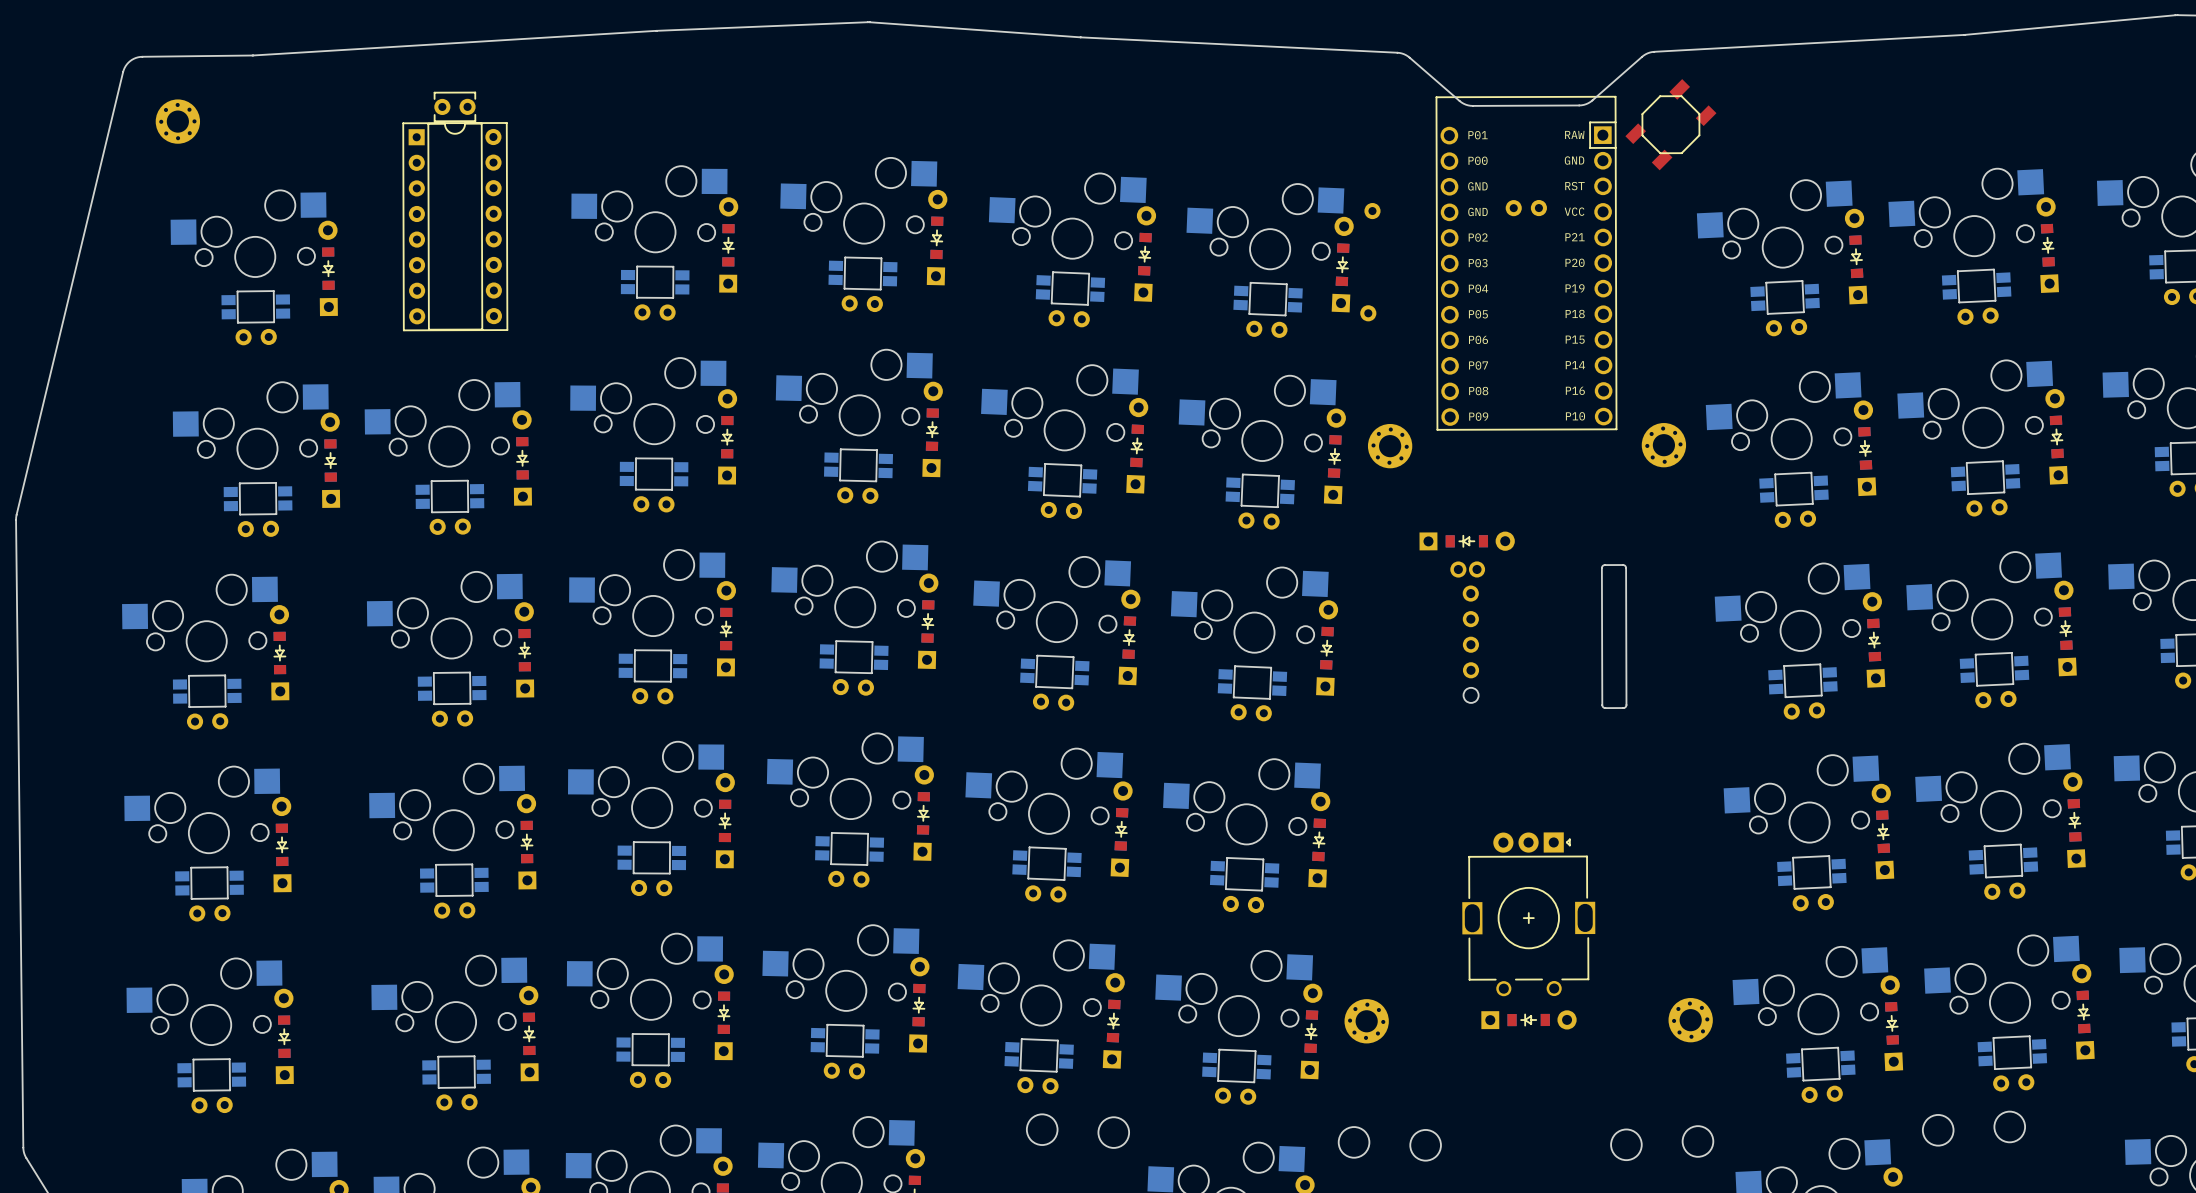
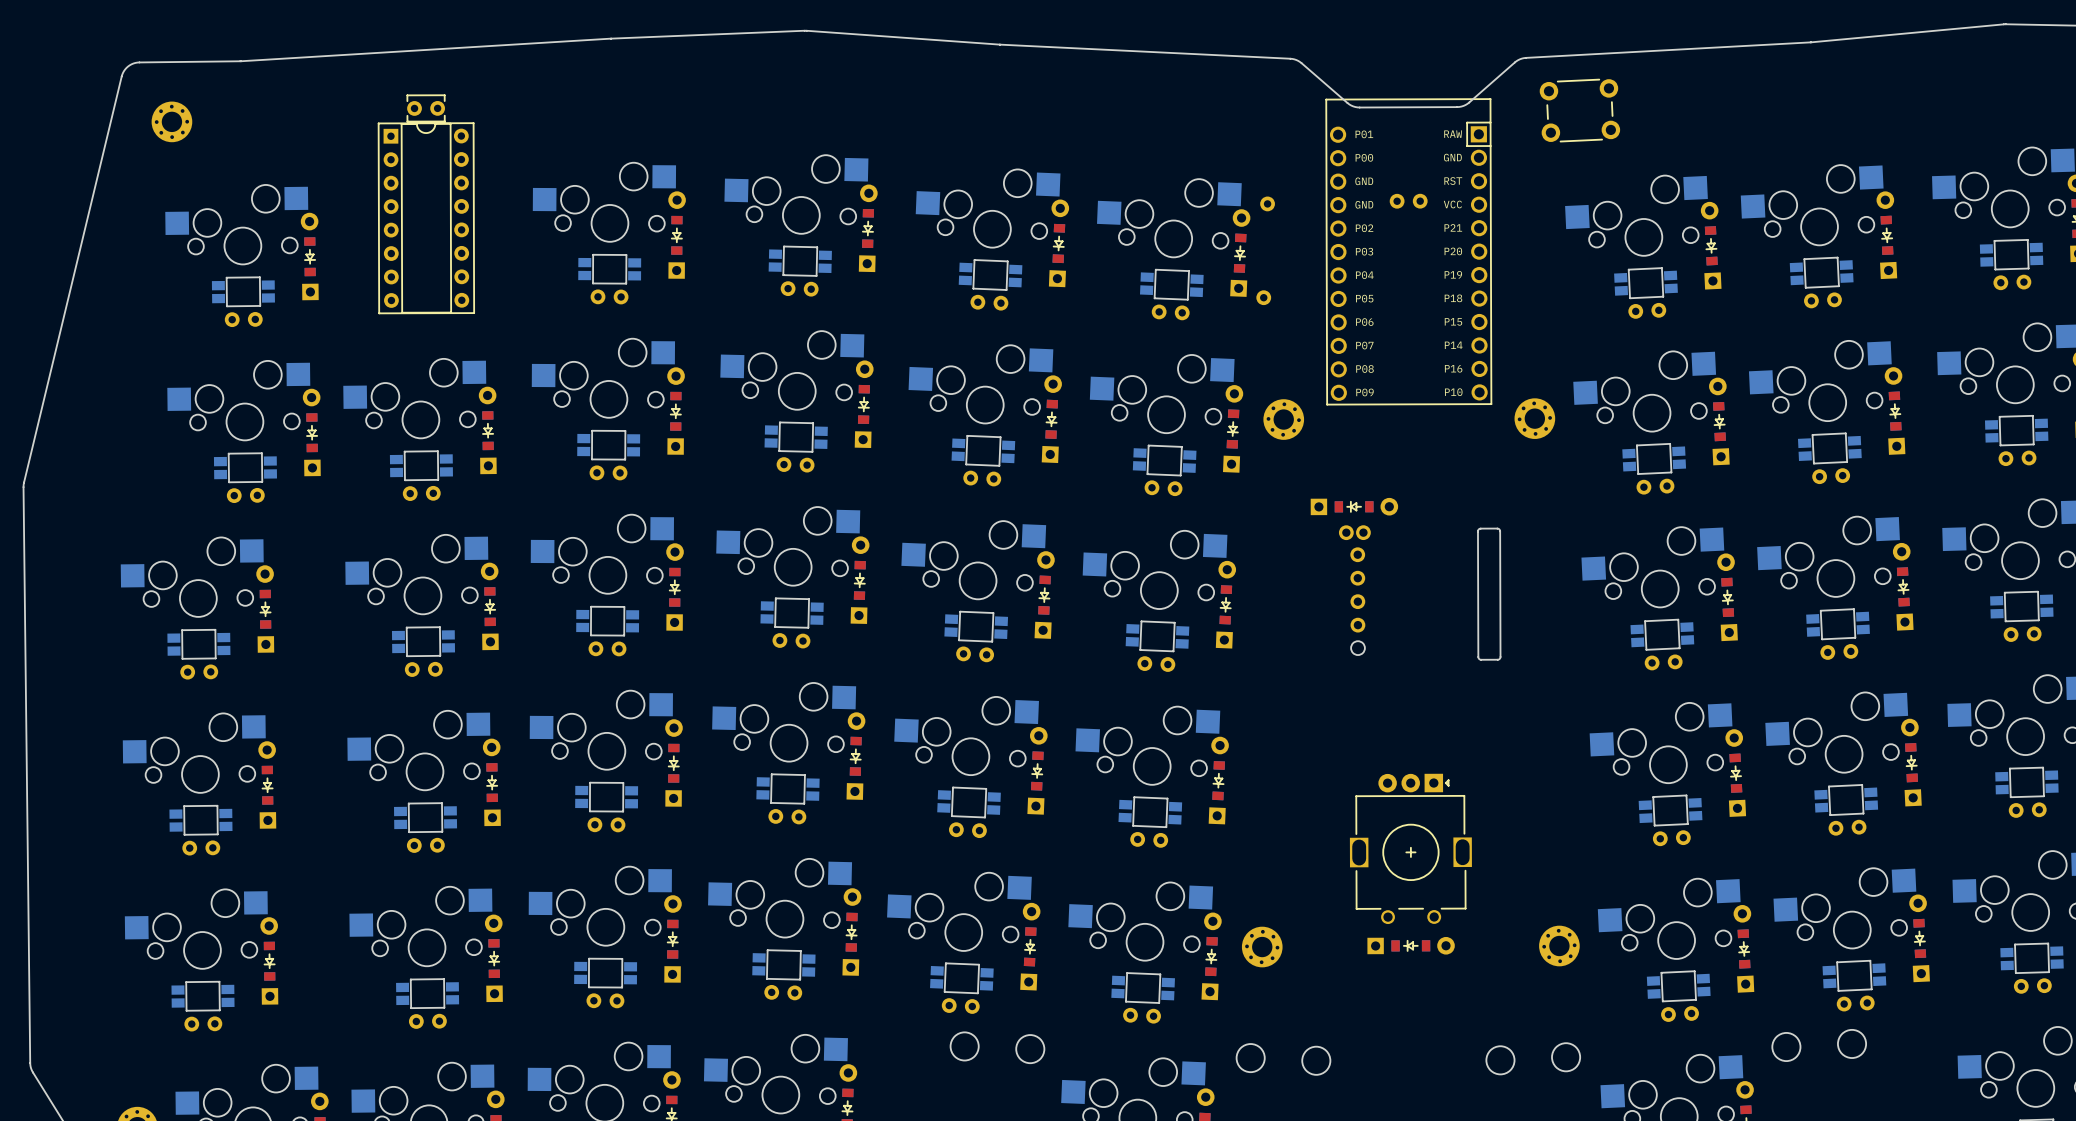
part: none -> (1579, 110)
part: (1670, 124) -> none

